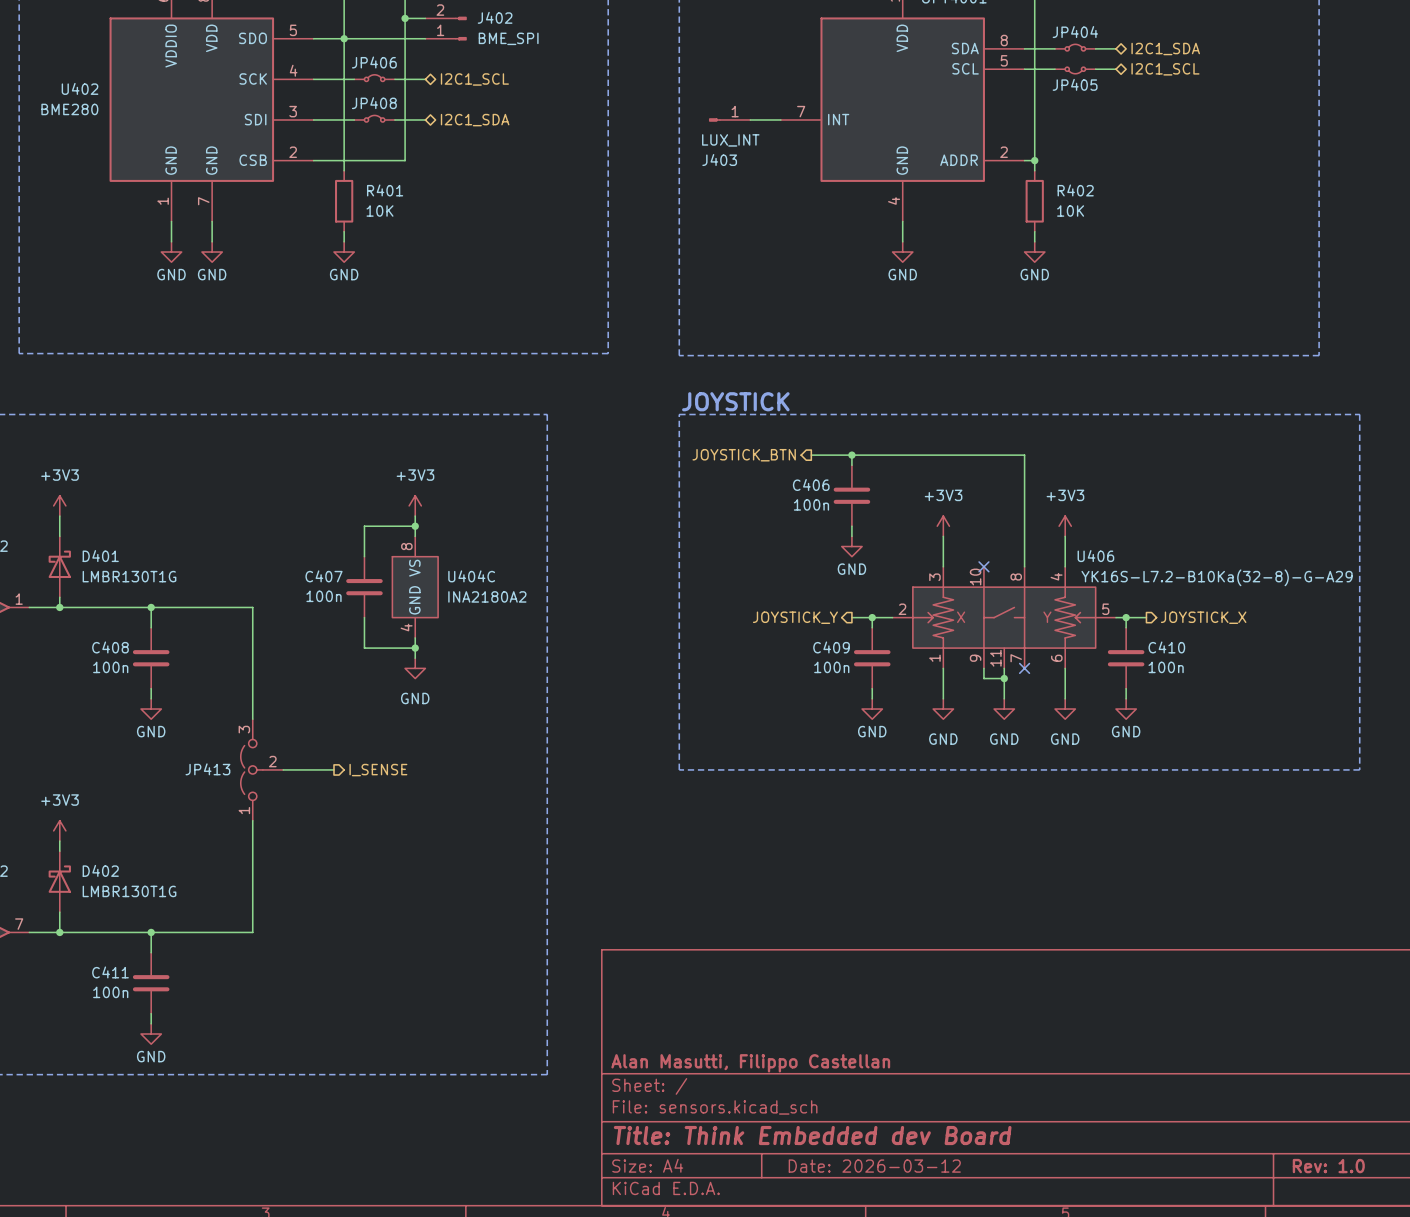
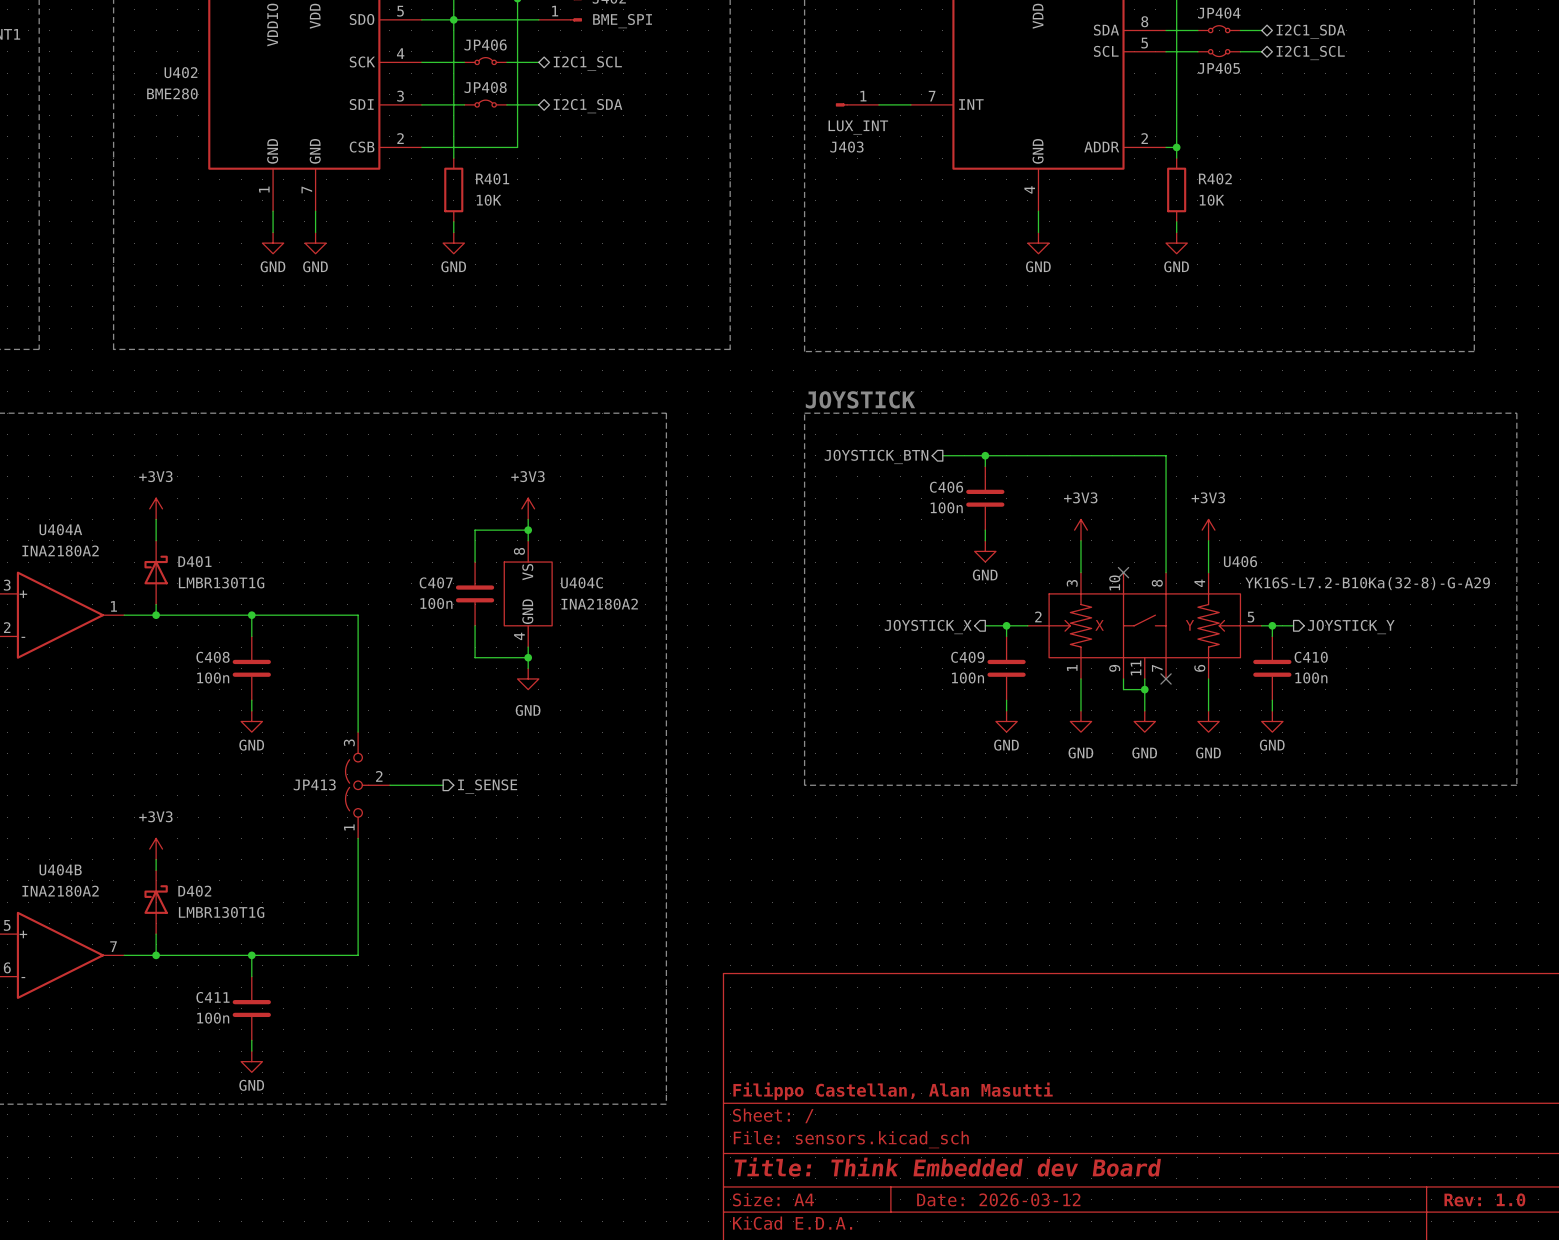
hierarchical label: JOYSTICK_Y (795, 617) -> JOYSTICK_X (928, 627)
hierarchical label: JOYSTICK_X (1203, 617) -> JOYSTICK_Y (1351, 627)
title block: Alan Masutti, Filippo Castellan (750, 1063) -> Filippo Castellan, Alan Masutti (893, 1091)

